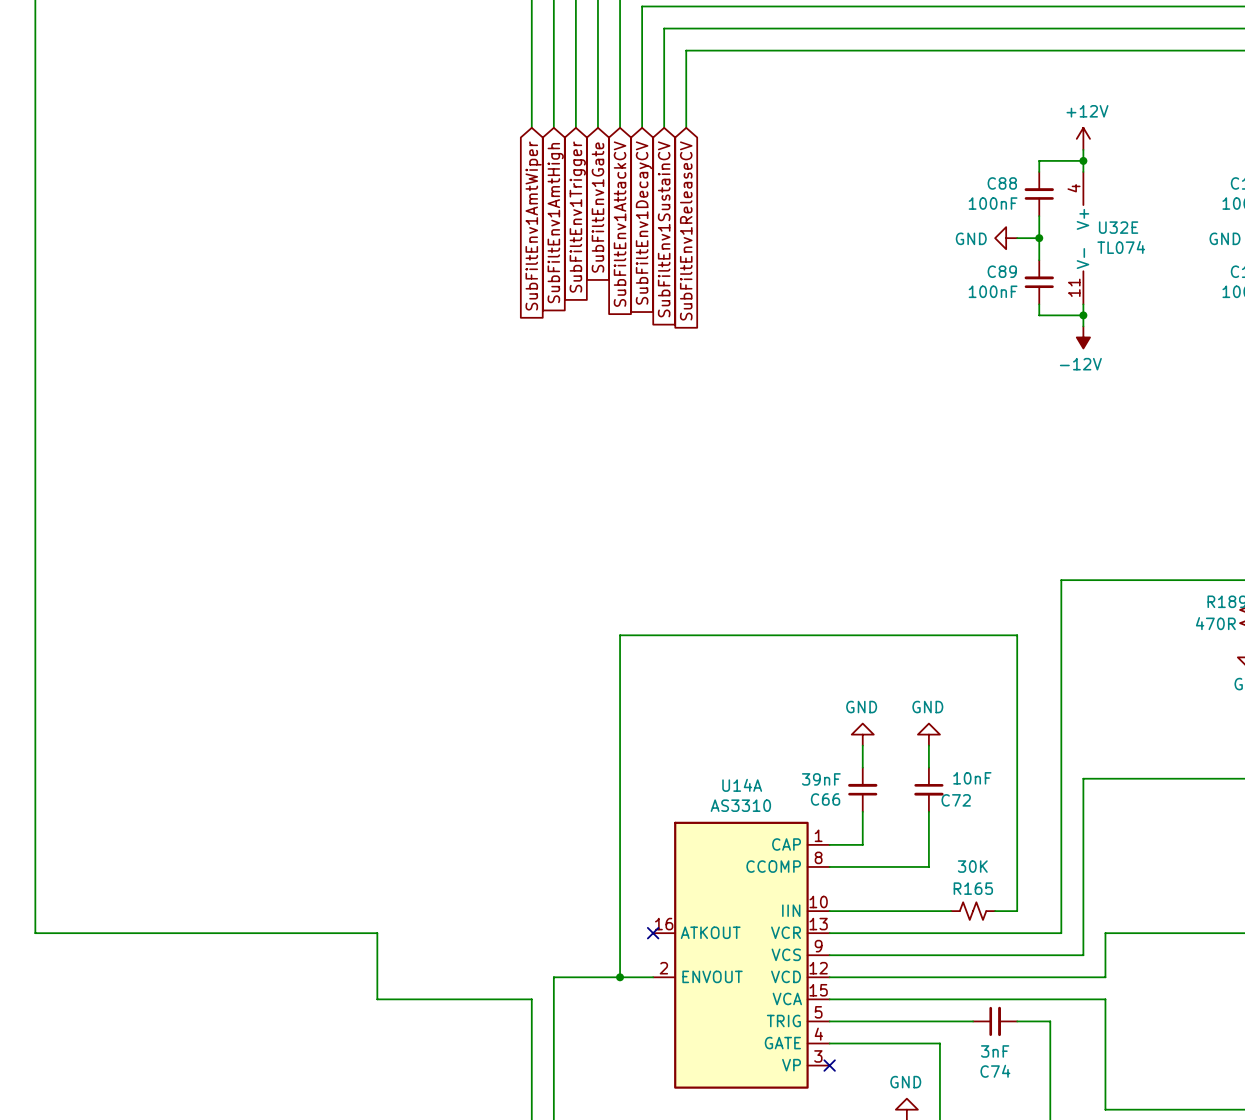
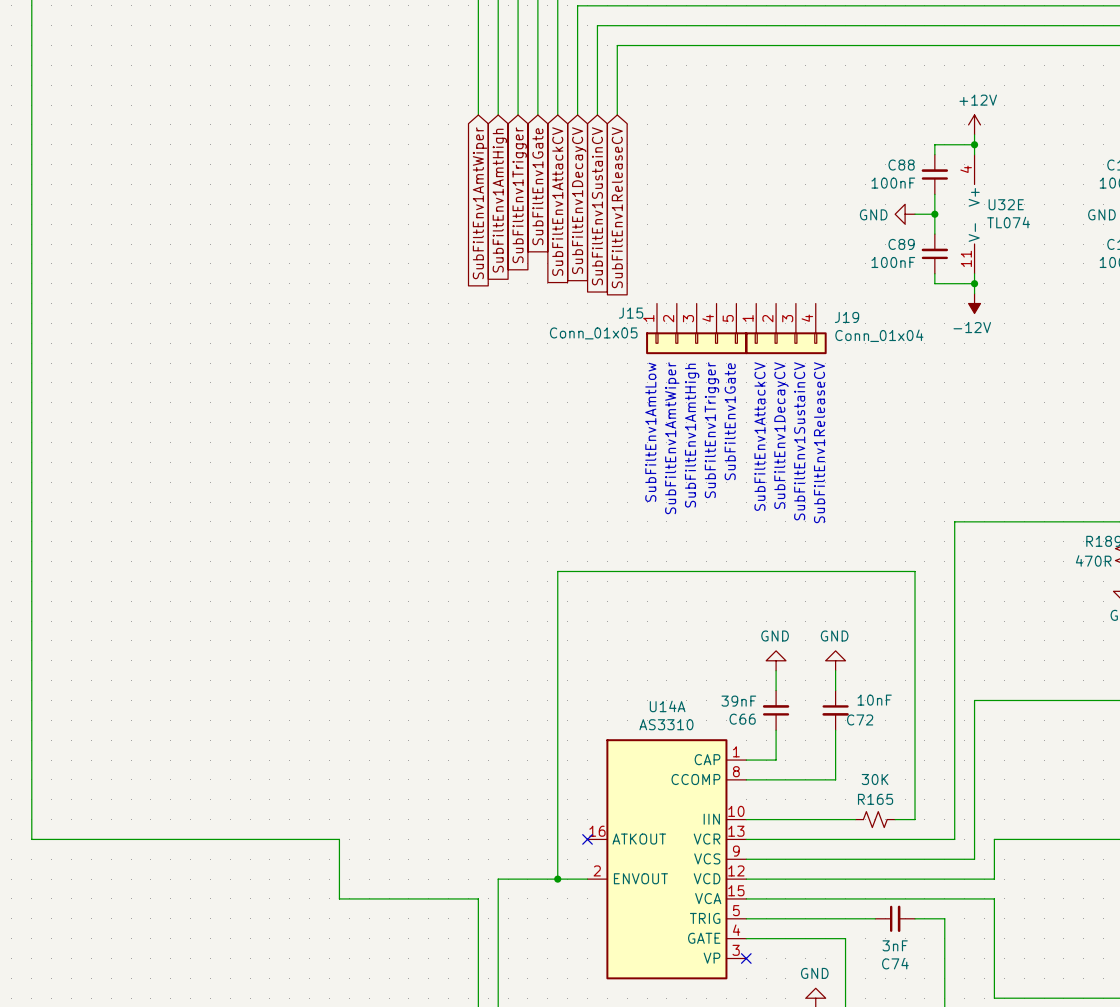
J15: none -> Conn_01x05 (696, 328)
J19: none -> Conn_01x04 (785, 328)
text: none -> SubFiltEnv1Gate (730, 421)
text: none -> SubFiltEnv1Trigger (712, 430)
text: none -> SubFiltEnv1AmtLow (650, 432)
text: none -> SubFiltEnv1AmtHigh (692, 435)
text: none -> SubFiltEnv1DecayCV (781, 435)
text: none -> SubFiltEnv1AttackCV (759, 436)
text: none -> SubFiltEnv1AmtWiper (672, 438)
text: none -> SubFiltEnv1SustainCV (799, 441)
text: none -> SubFiltEnv1ReleaseCV (819, 442)

